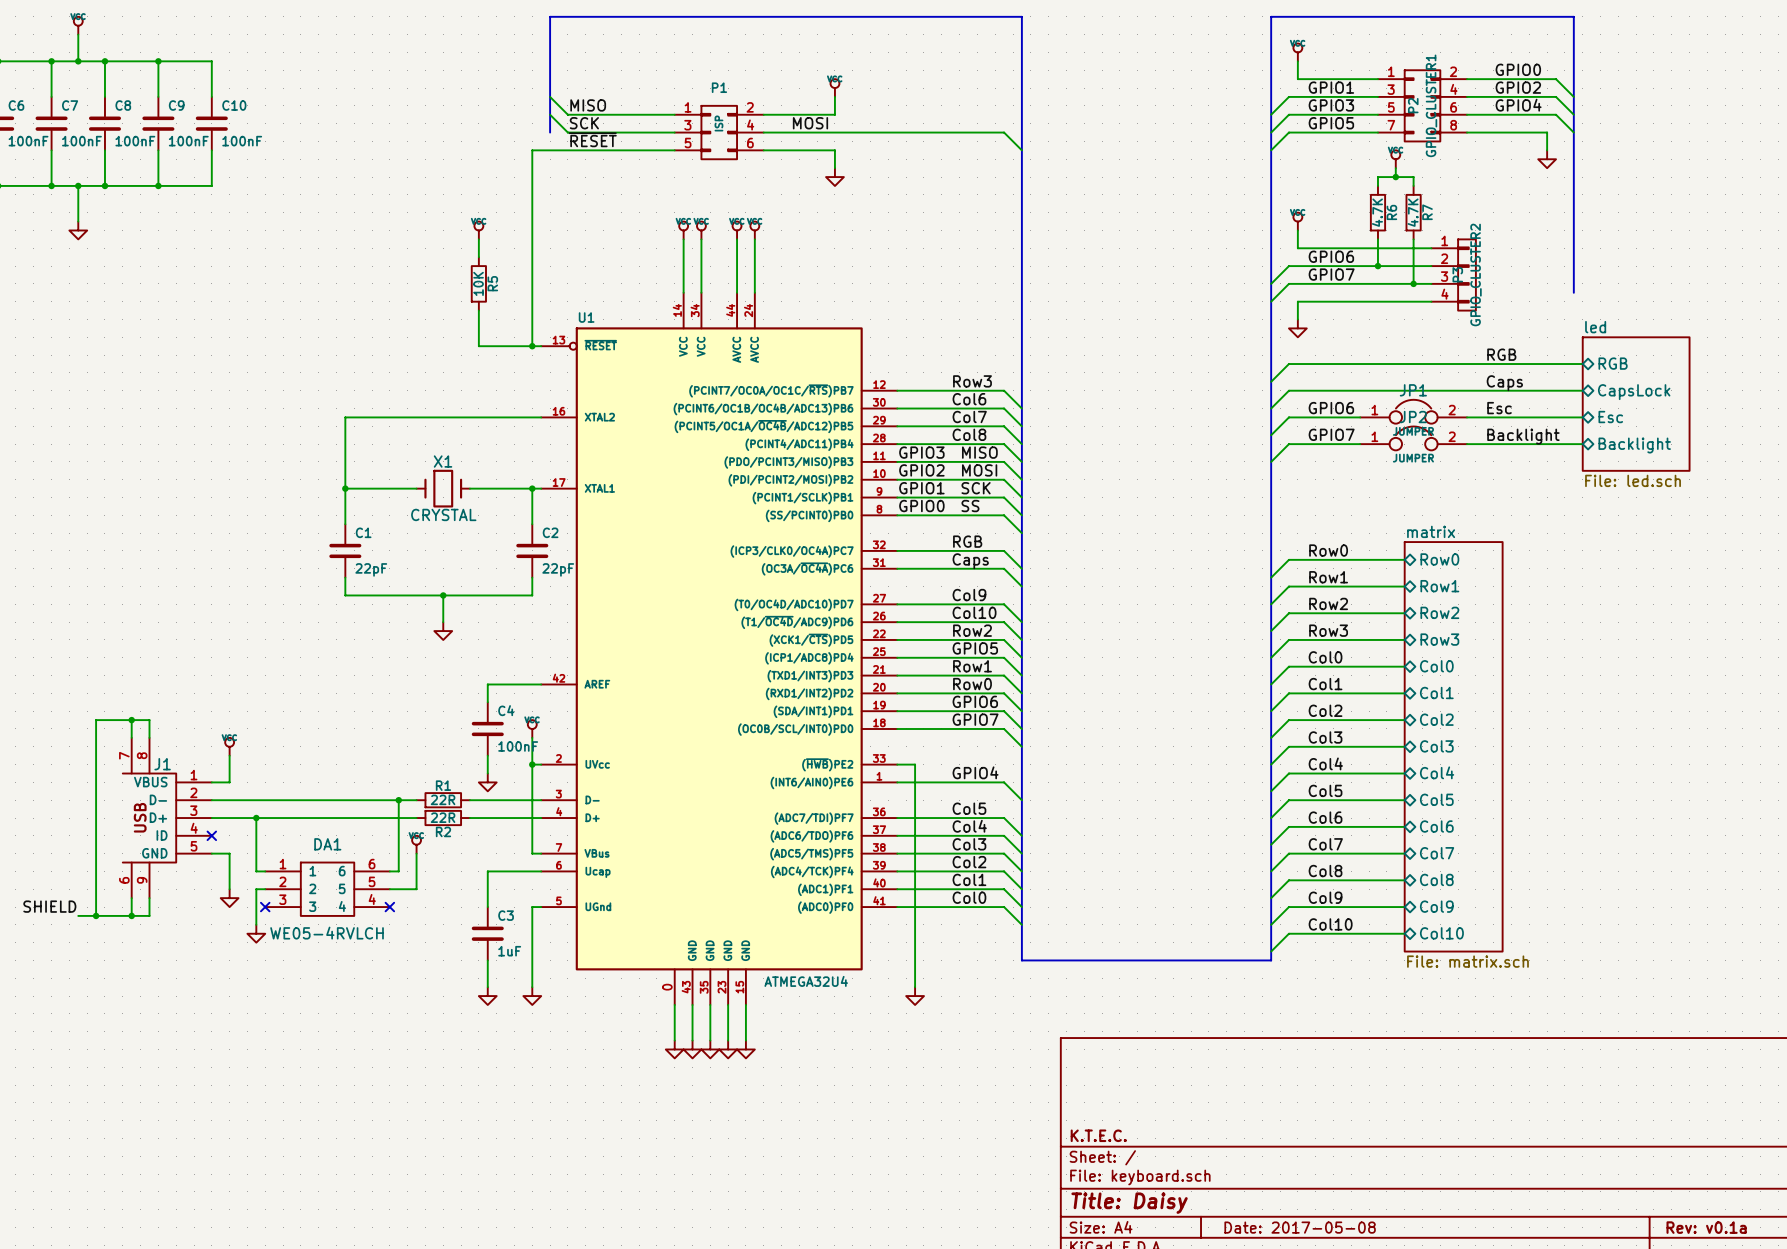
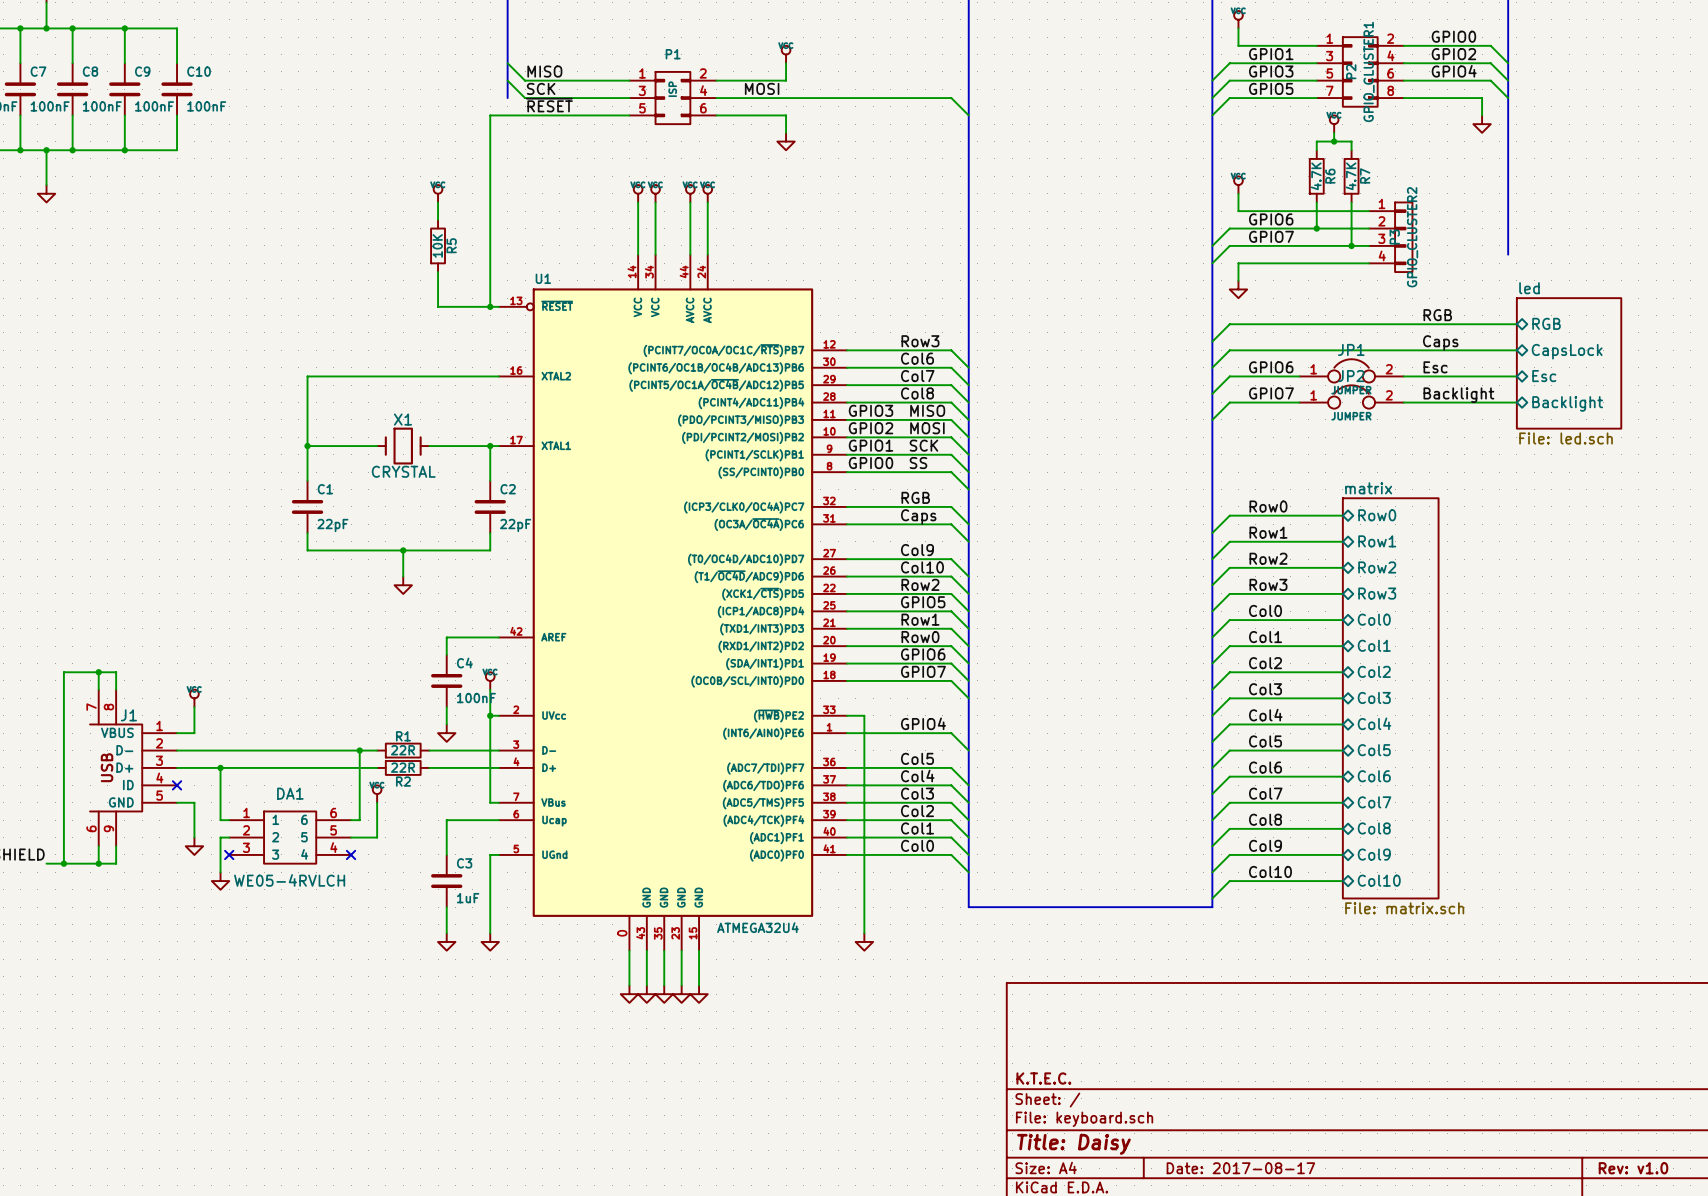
title block: Date: 2017-05-08 (1300, 1227) -> Date: 2017-08-17 (1240, 1168)
title block: Rev: v0.1a (1706, 1227) -> Rev: v1.0 (1633, 1168)

